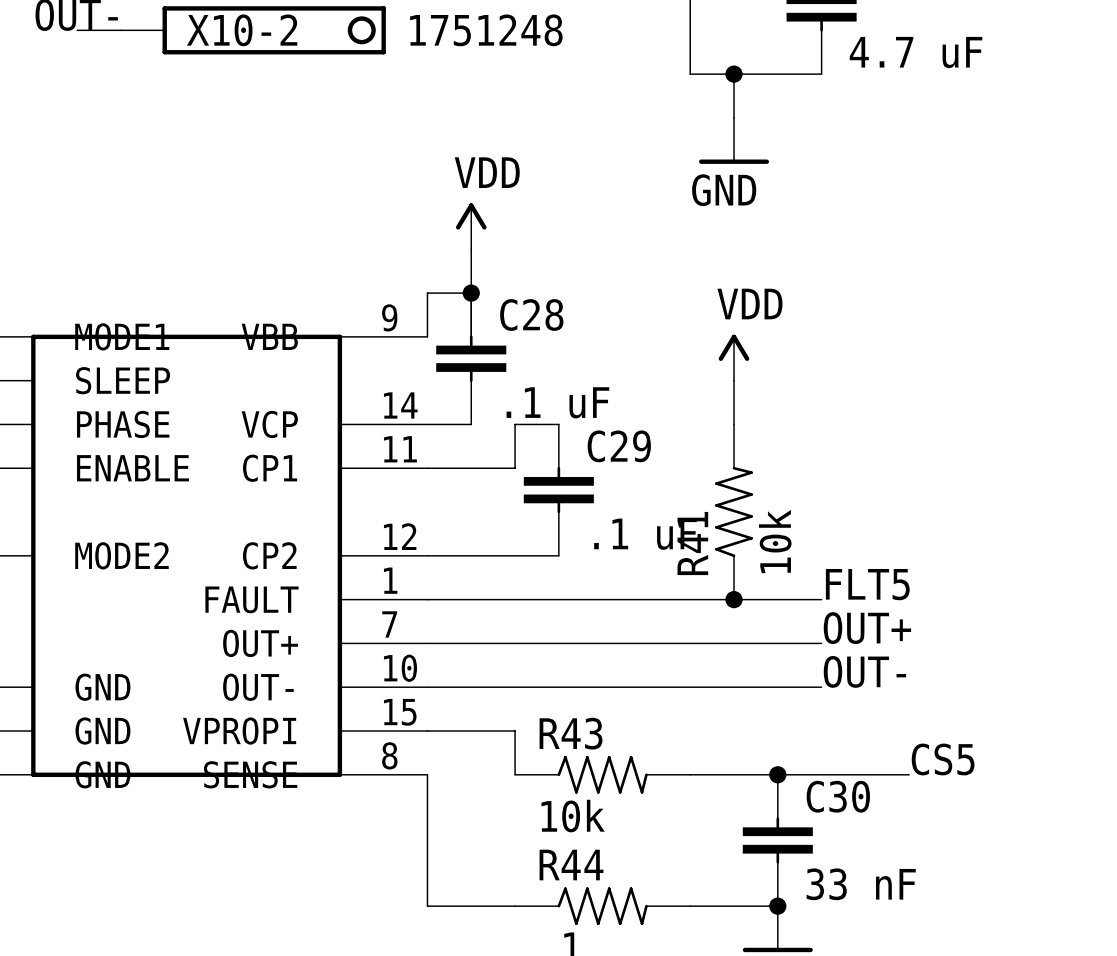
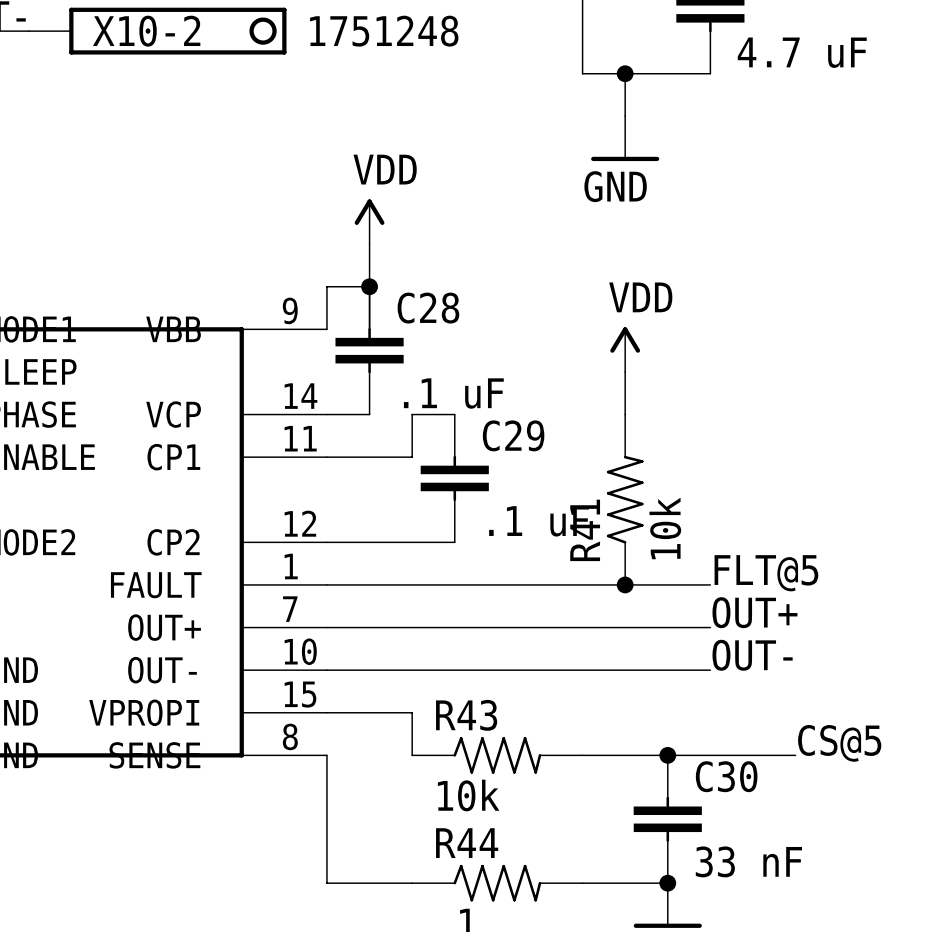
label: FLT5 (867, 584) -> FLT@5 (766, 573)
label: CS5 (943, 759) -> CS@5 (839, 743)

